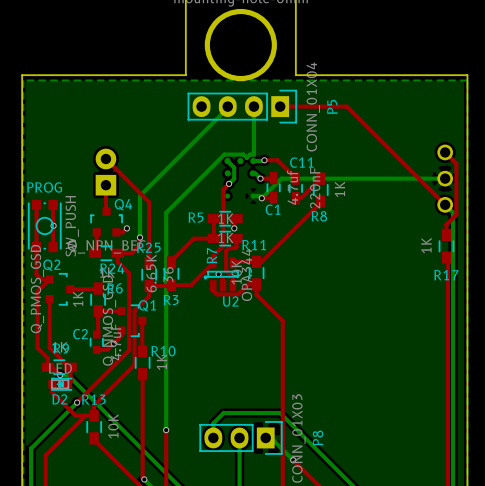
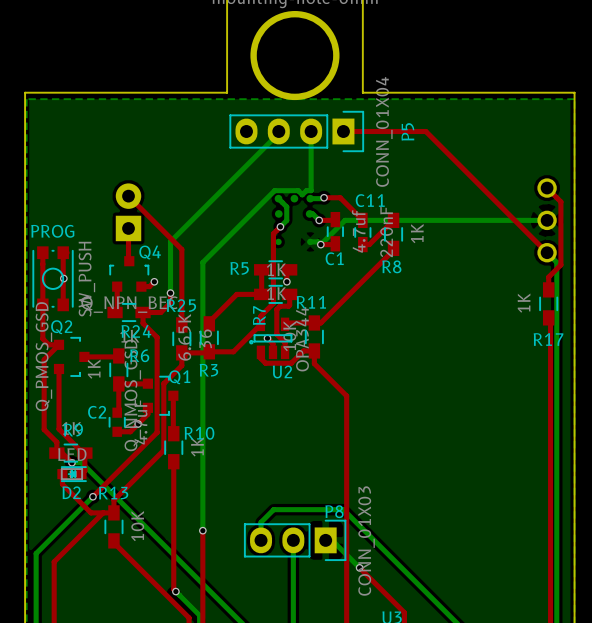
P8 name rotation: 0° (318, 438) -> 90° clockwise (334, 511)
P8 name position: P8 (318, 438) -> P8 (334, 511)

